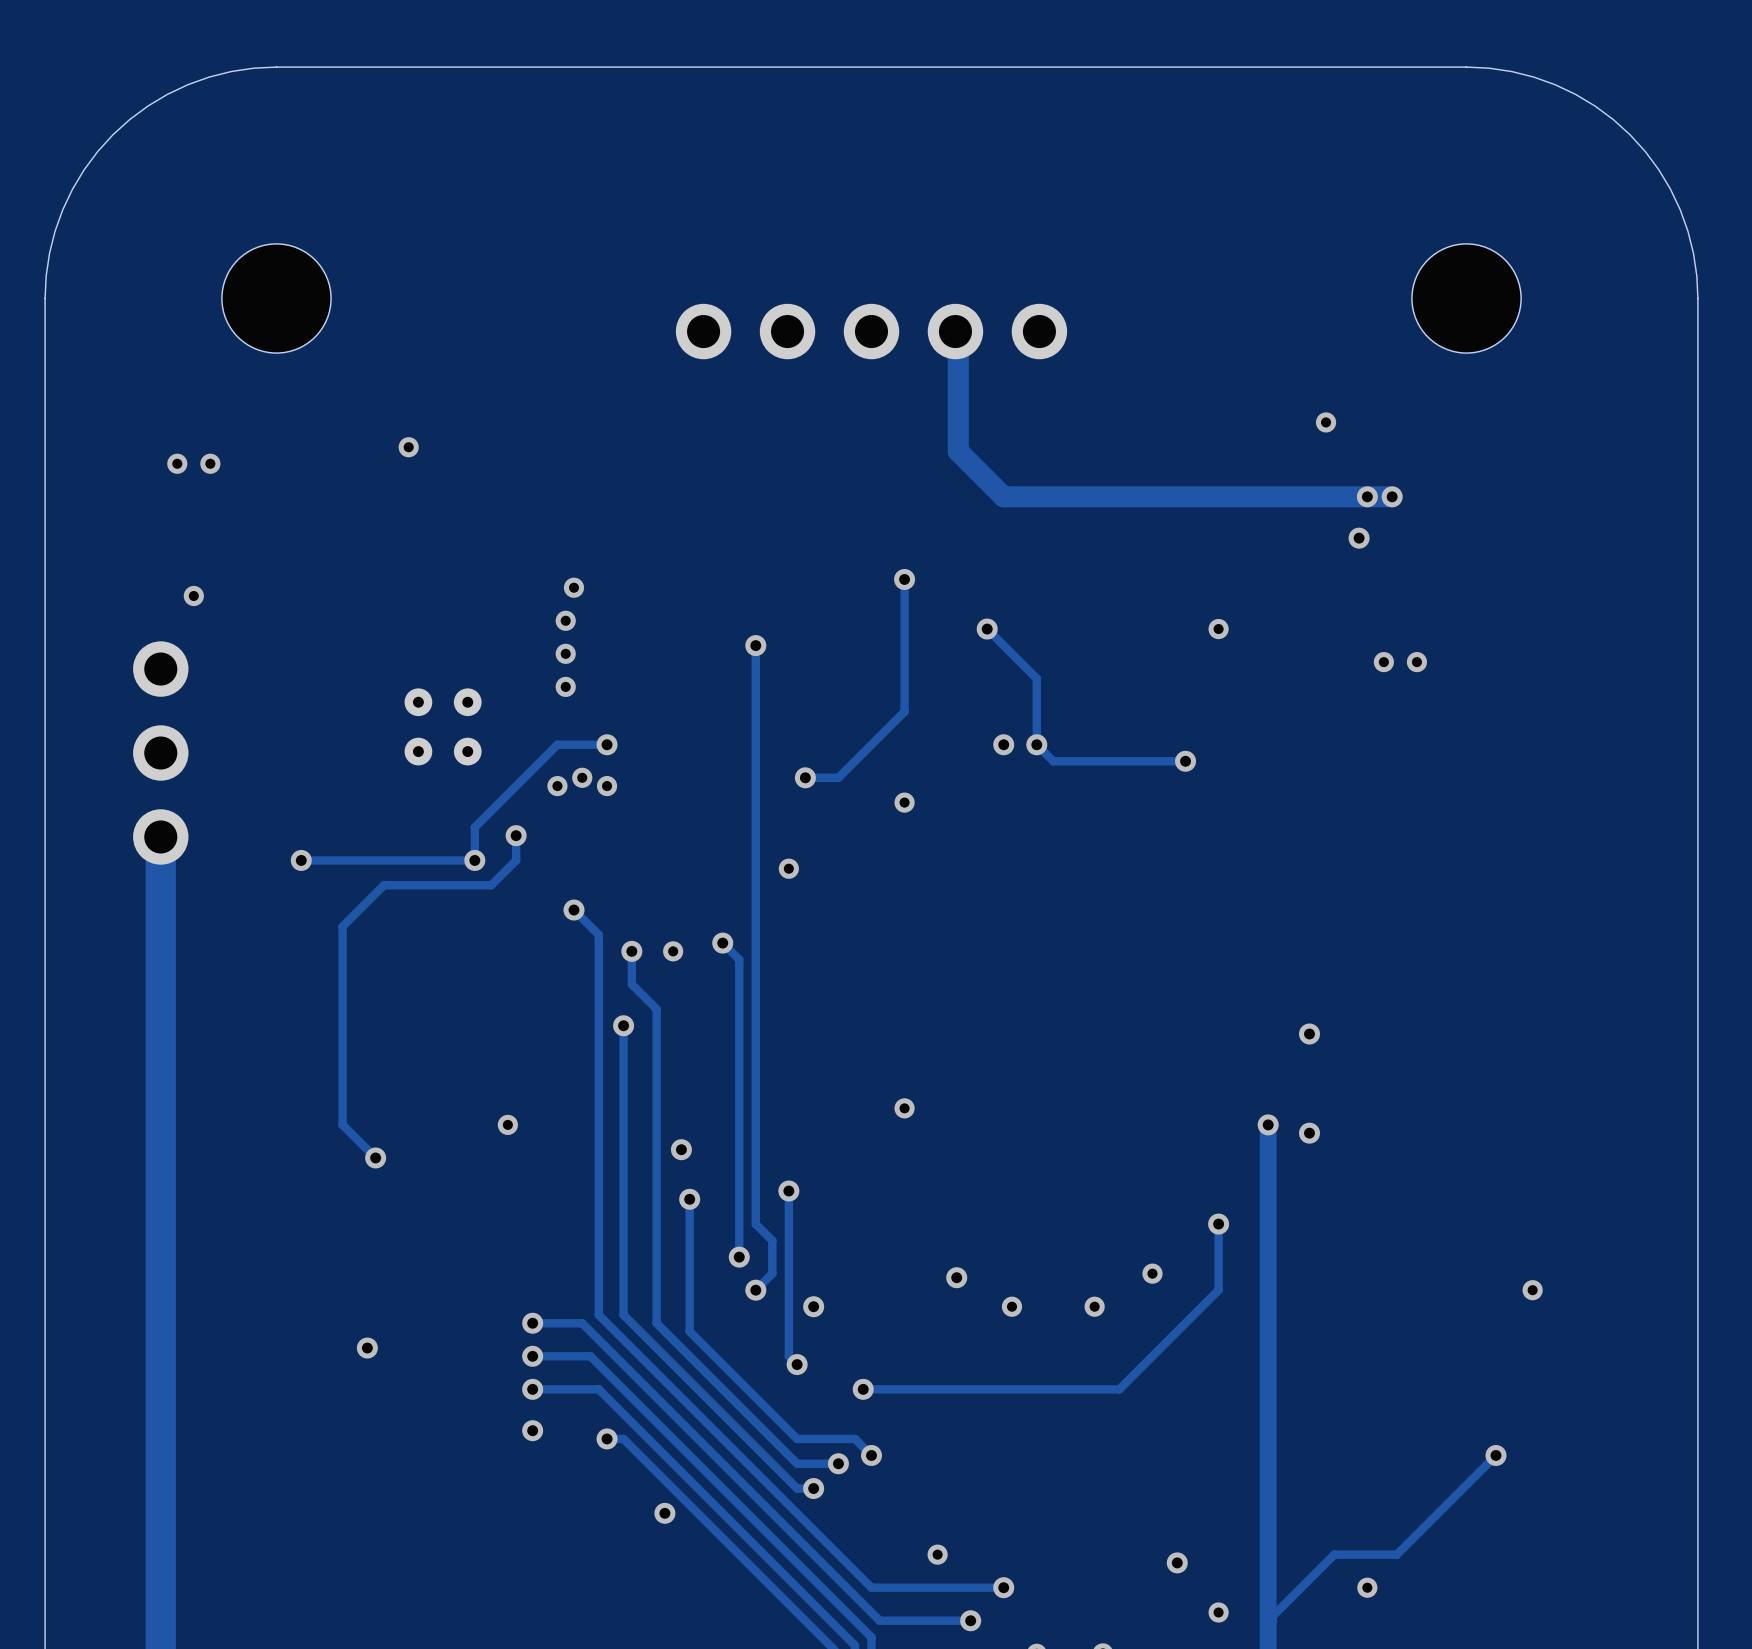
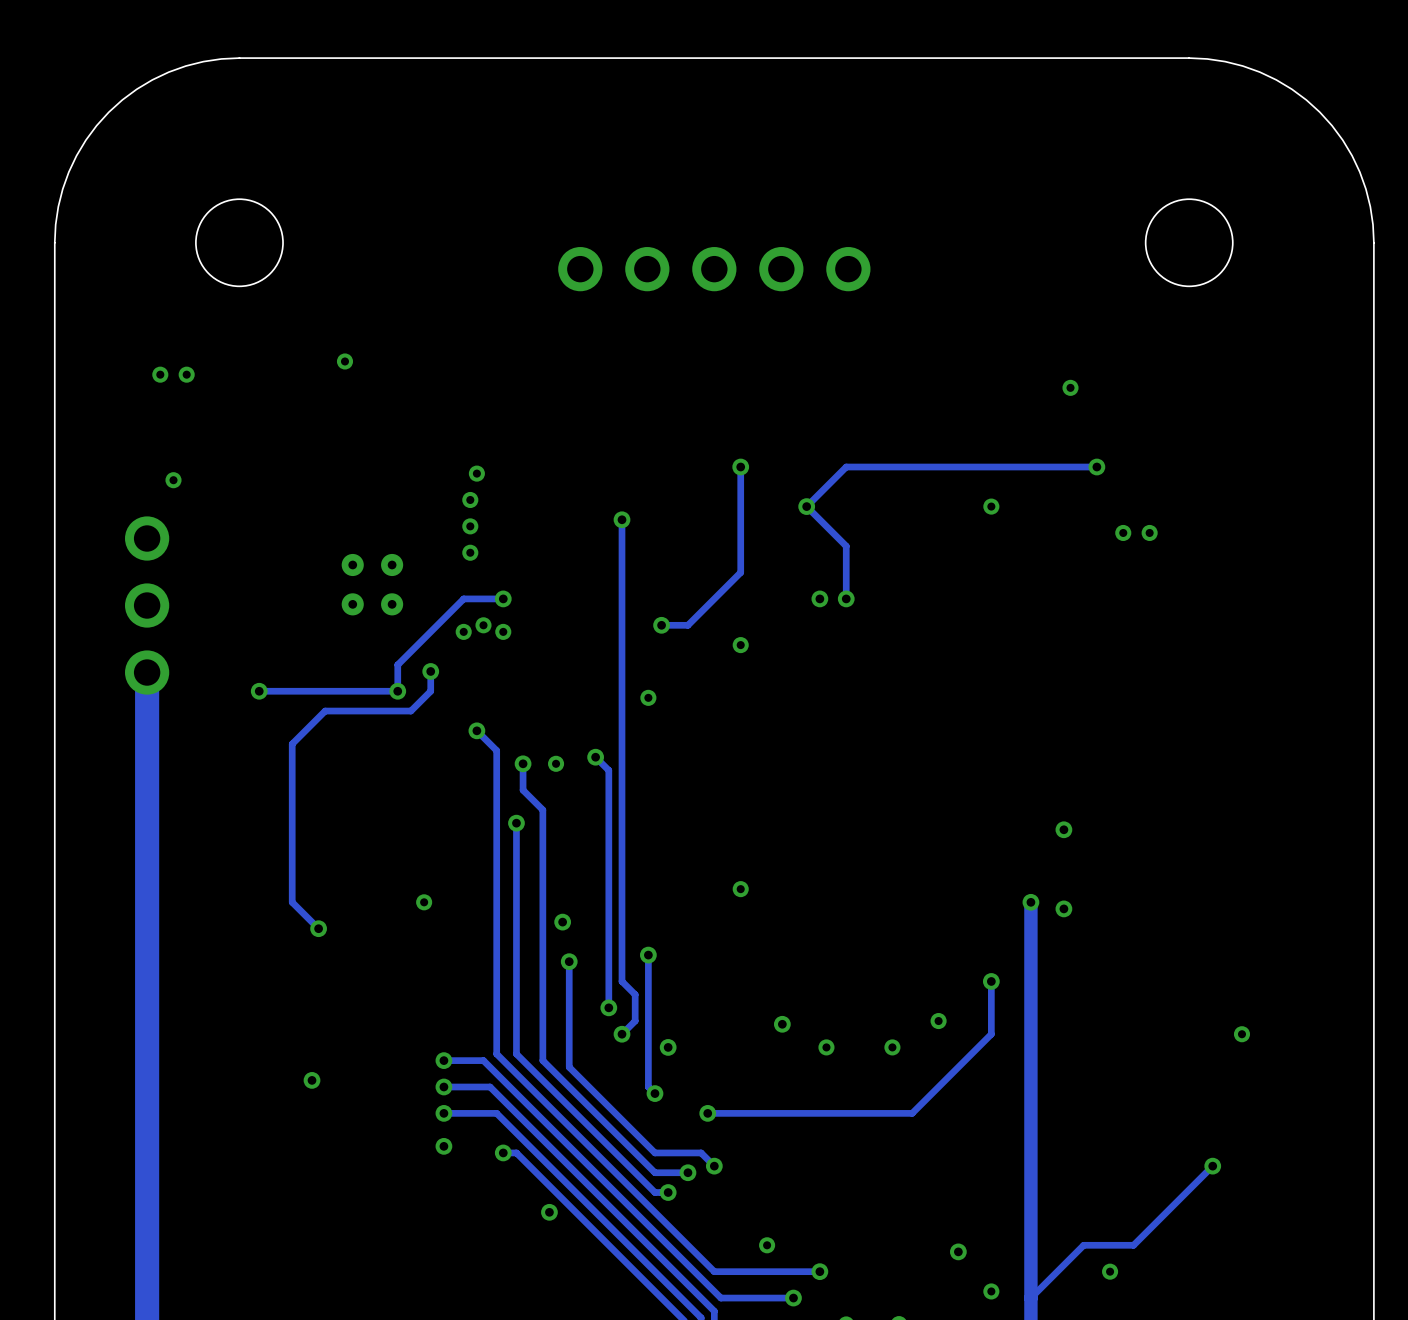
track: (955, 331) (958, 334) (958, 451) (1003, 496) (1392, 496) -> none
via position: (1326, 422) -> (1070, 387)
via: (1367, 496) -> none
via: (1392, 496) -> none
via: (1359, 538) -> none
track: none -> (1096, 467) (846, 467) (806, 506)
via: none -> (1096, 467)
track: (1036, 744) (1053, 761) (1185, 761) -> none
via: (1185, 761) -> none

